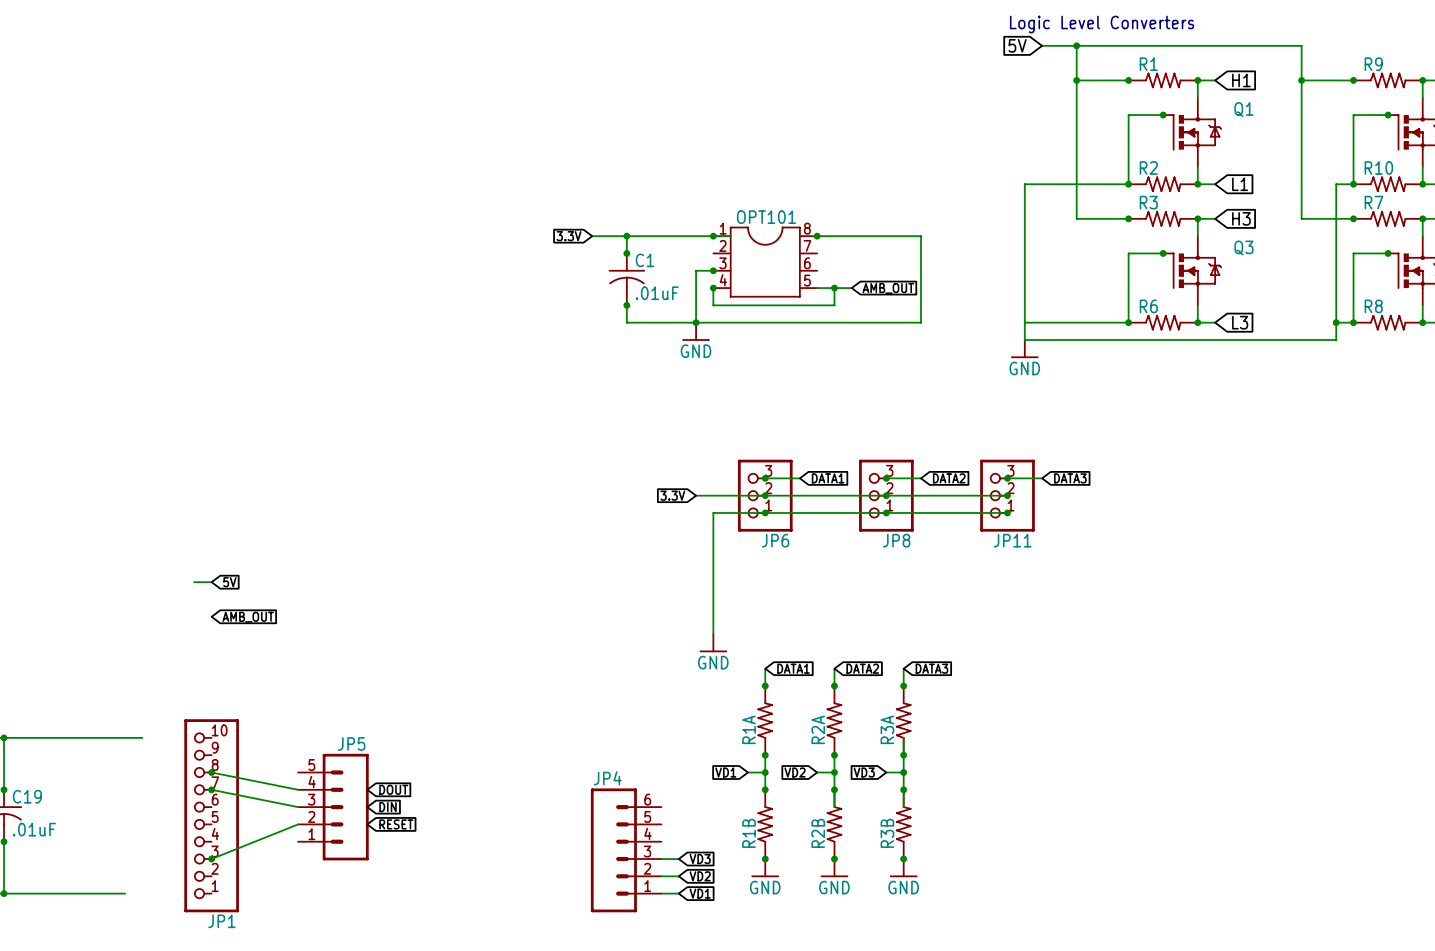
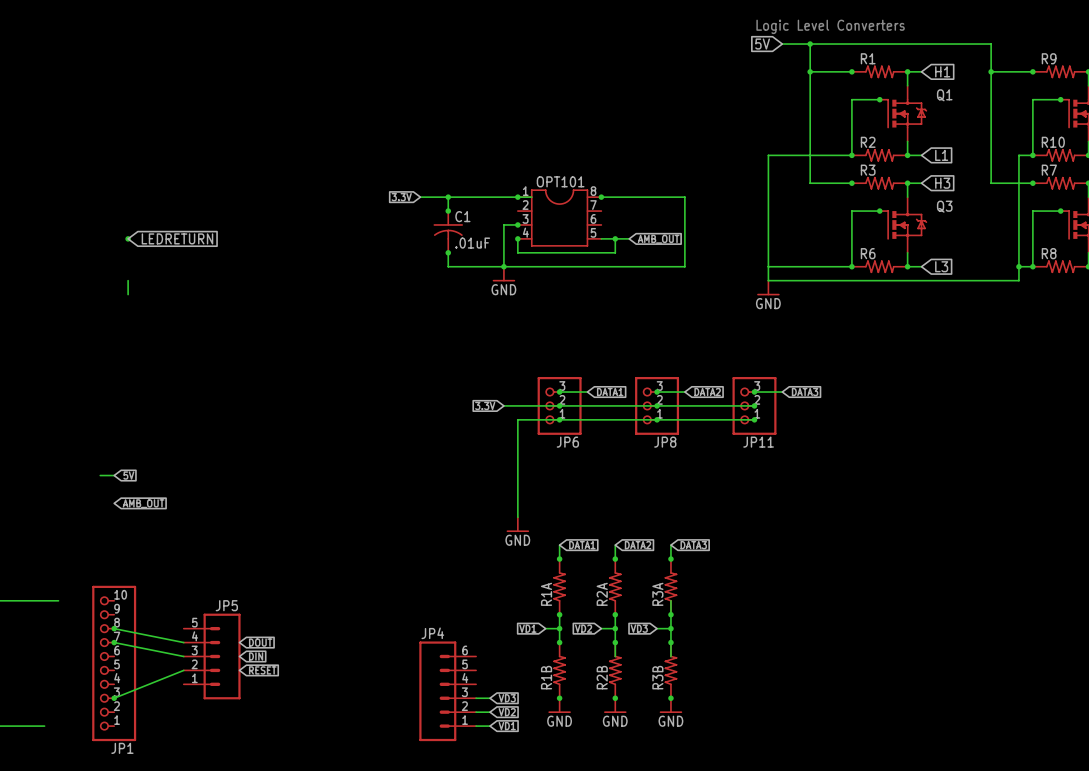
junction: none -> (128, 238)
global label: none -> LEDRETURN (177, 238)
wire: none -> (128, 280) (128, 294)

